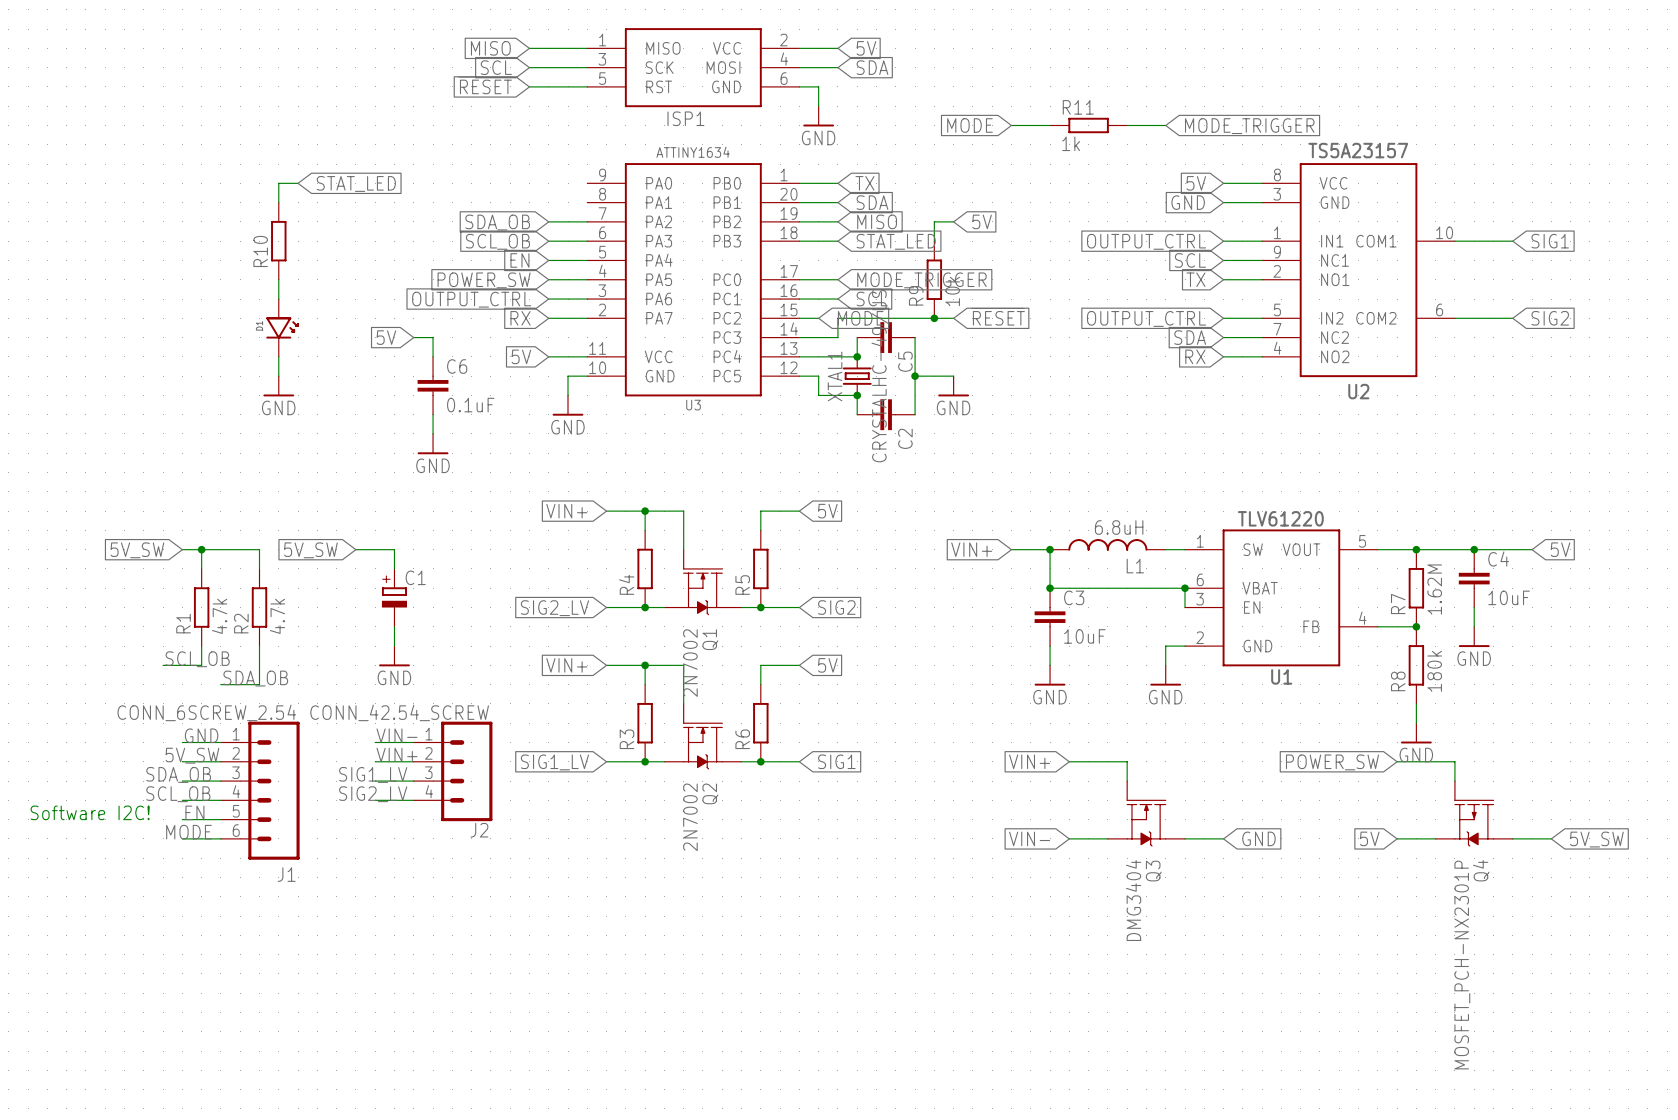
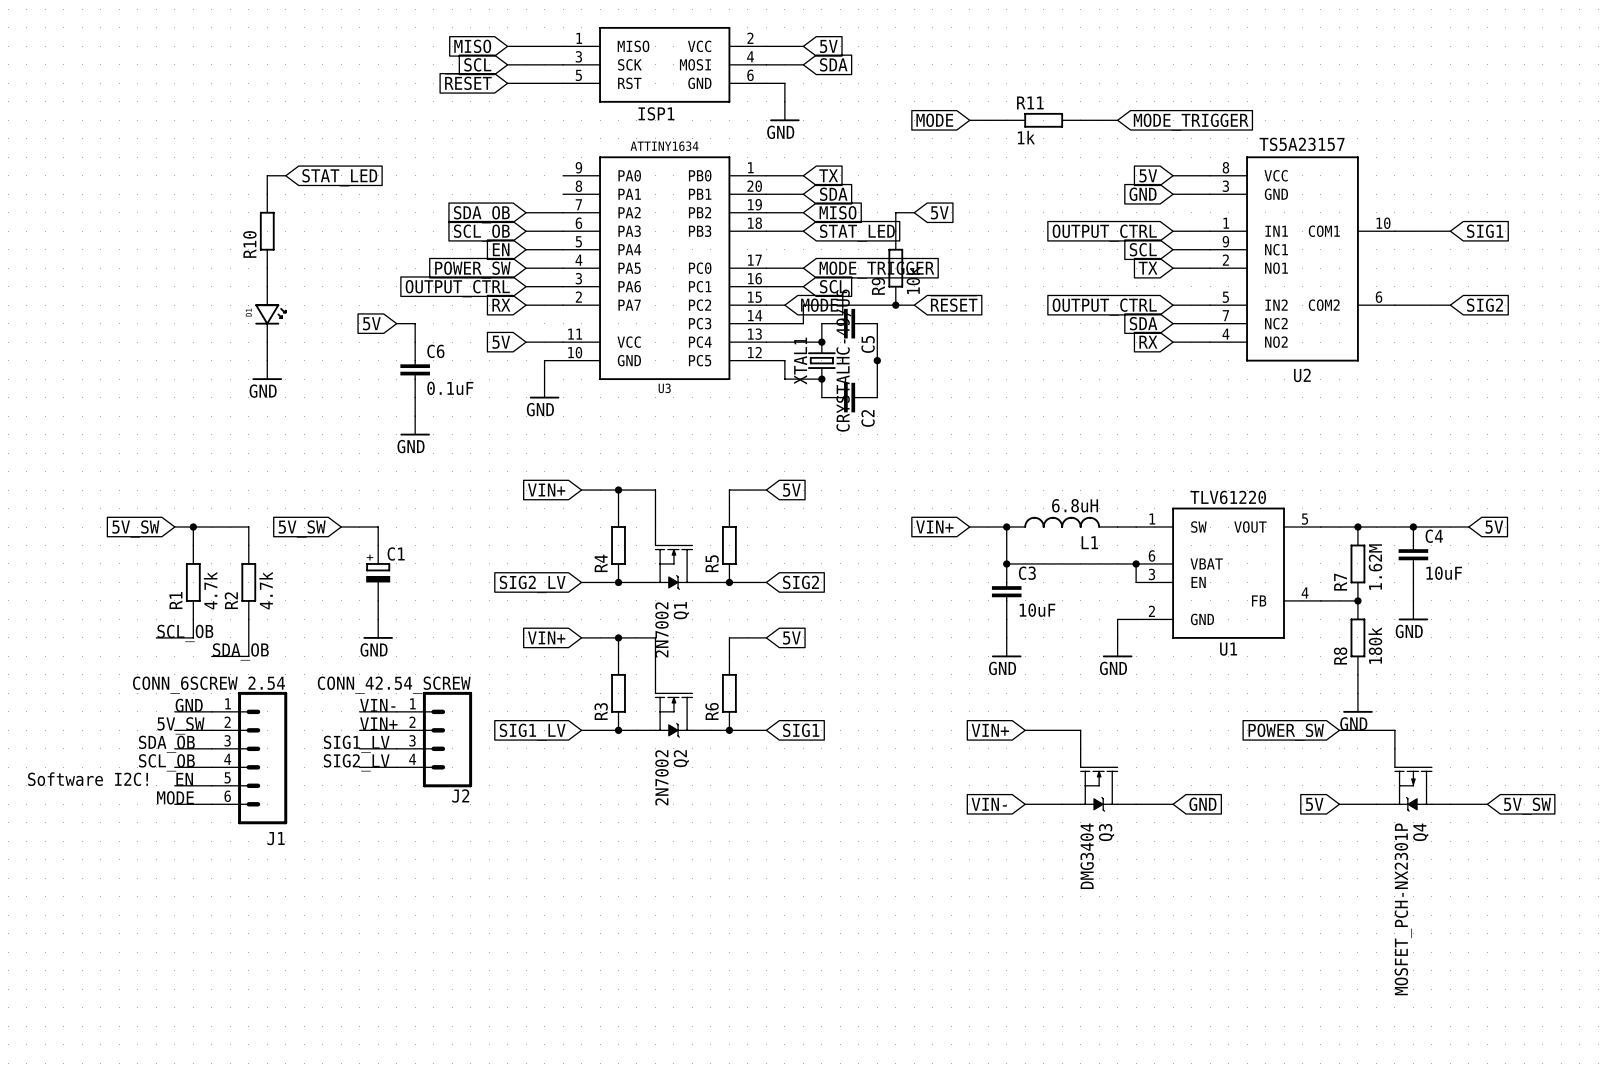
wire: (915, 376) (953, 376) -> none
power symbol: GND (953, 386) -> none

